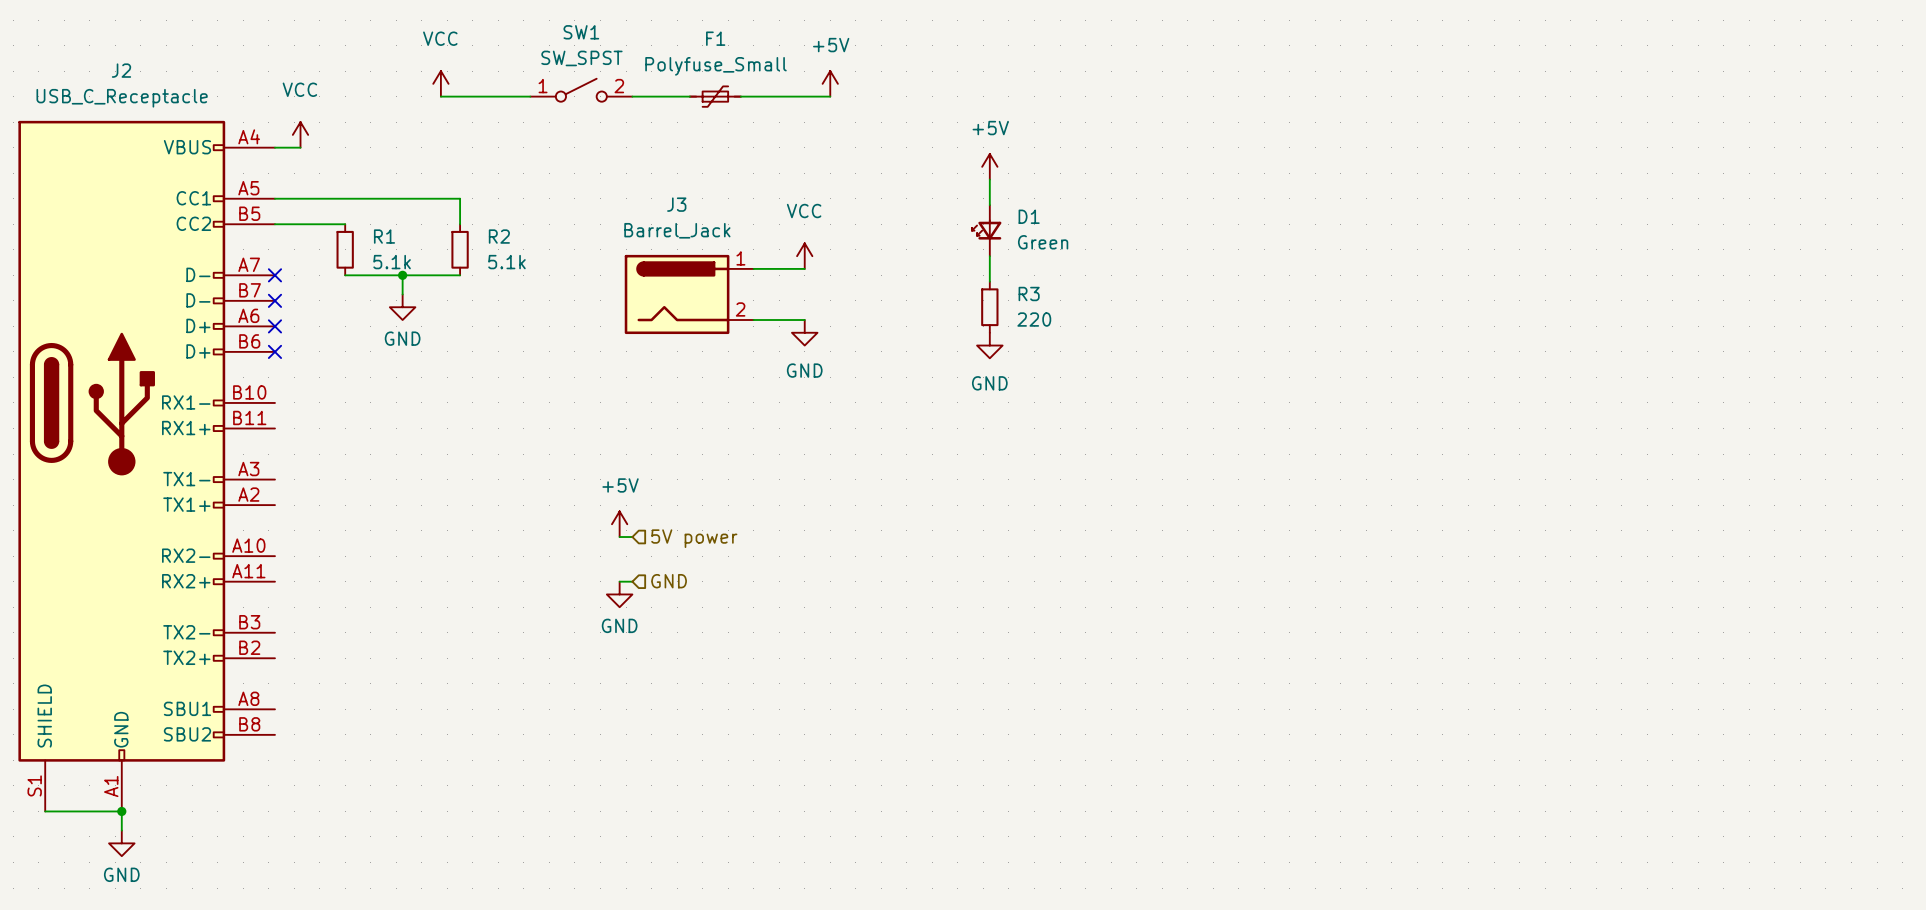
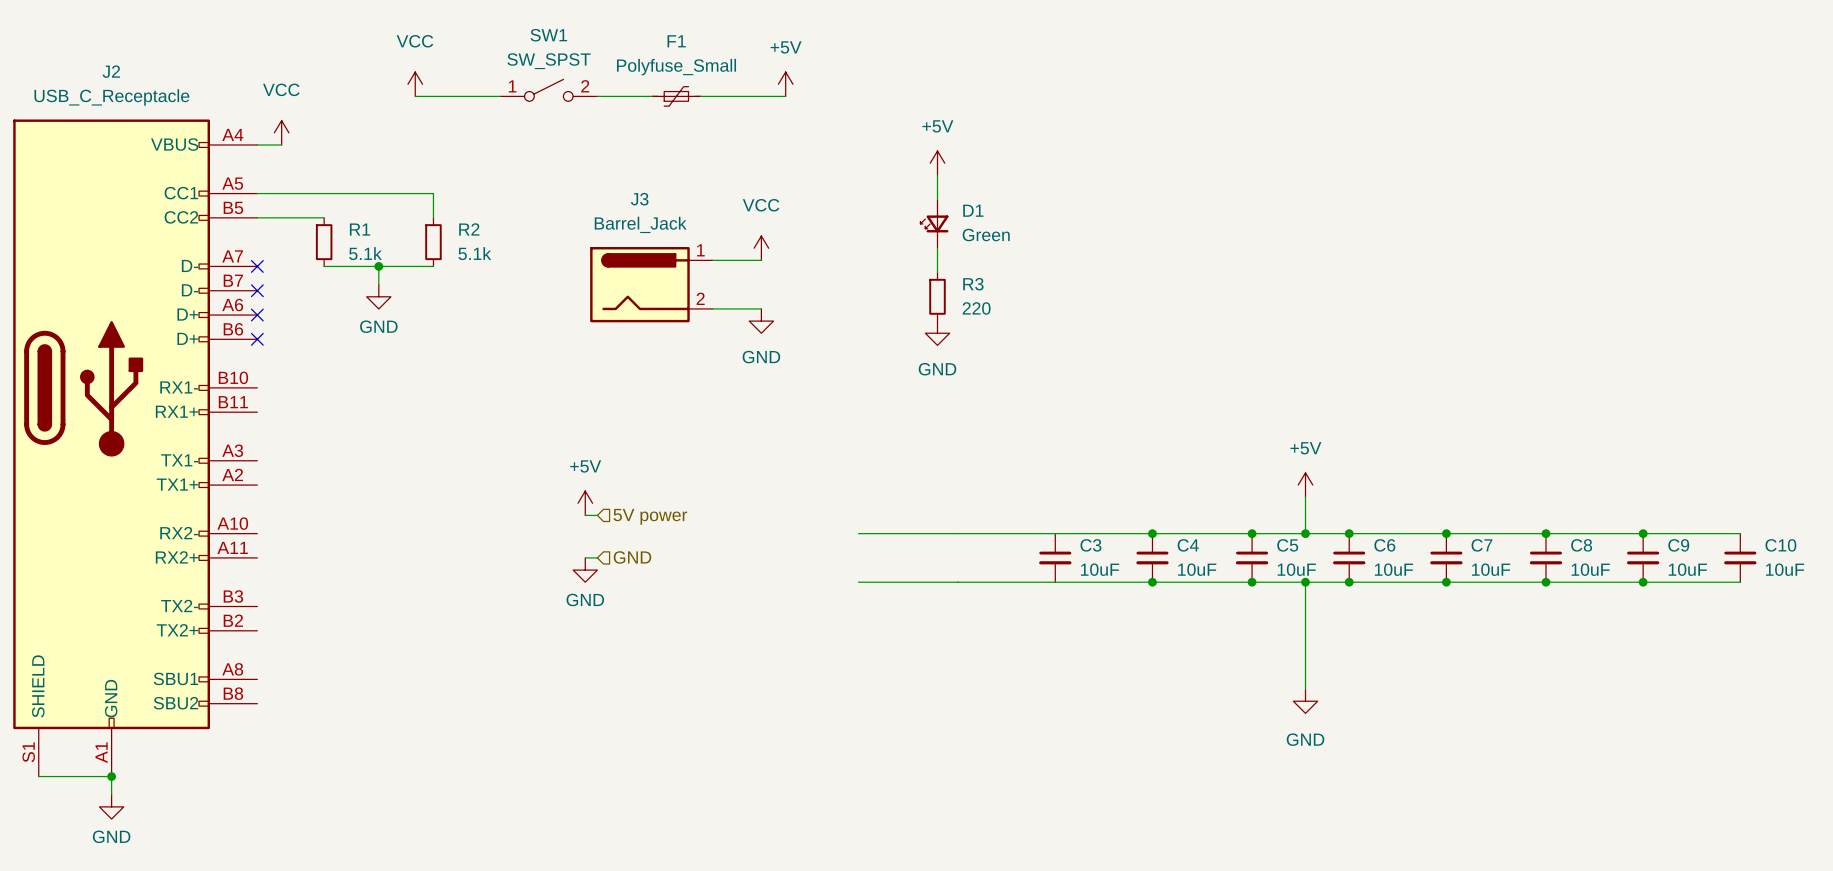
power symbol: none -> +5V (1305, 485)
wire: none -> (1305, 497) (1305, 533)
wire: none -> (858, 533) (1740, 533)
junction: none -> (1152, 533)
junction: none -> (1252, 533)
junction: none -> (1305, 533)
junction: none -> (1349, 533)
junction: none -> (1446, 533)
junction: none -> (1545, 533)
junction: none -> (1643, 533)
C3: none -> 10uF (1055, 557)
C4: none -> 10uF (1152, 557)
C5: none -> 10uF (1252, 557)
C6: none -> 10uF (1349, 557)
C7: none -> 10uF (1446, 557)
C8: none -> 10uF (1545, 557)
C9: none -> 10uF (1643, 557)
C10: none -> 10uF (1740, 557)
wire: none -> (858, 582) (1740, 582)
junction: none -> (1152, 582)
junction: none -> (1252, 582)
wire: none -> (1305, 582) (1305, 689)
junction: none -> (1305, 582)
junction: none -> (1349, 582)
junction: none -> (1446, 582)
junction: none -> (1545, 582)
junction: none -> (1643, 582)
power symbol: none -> GND (1305, 701)

